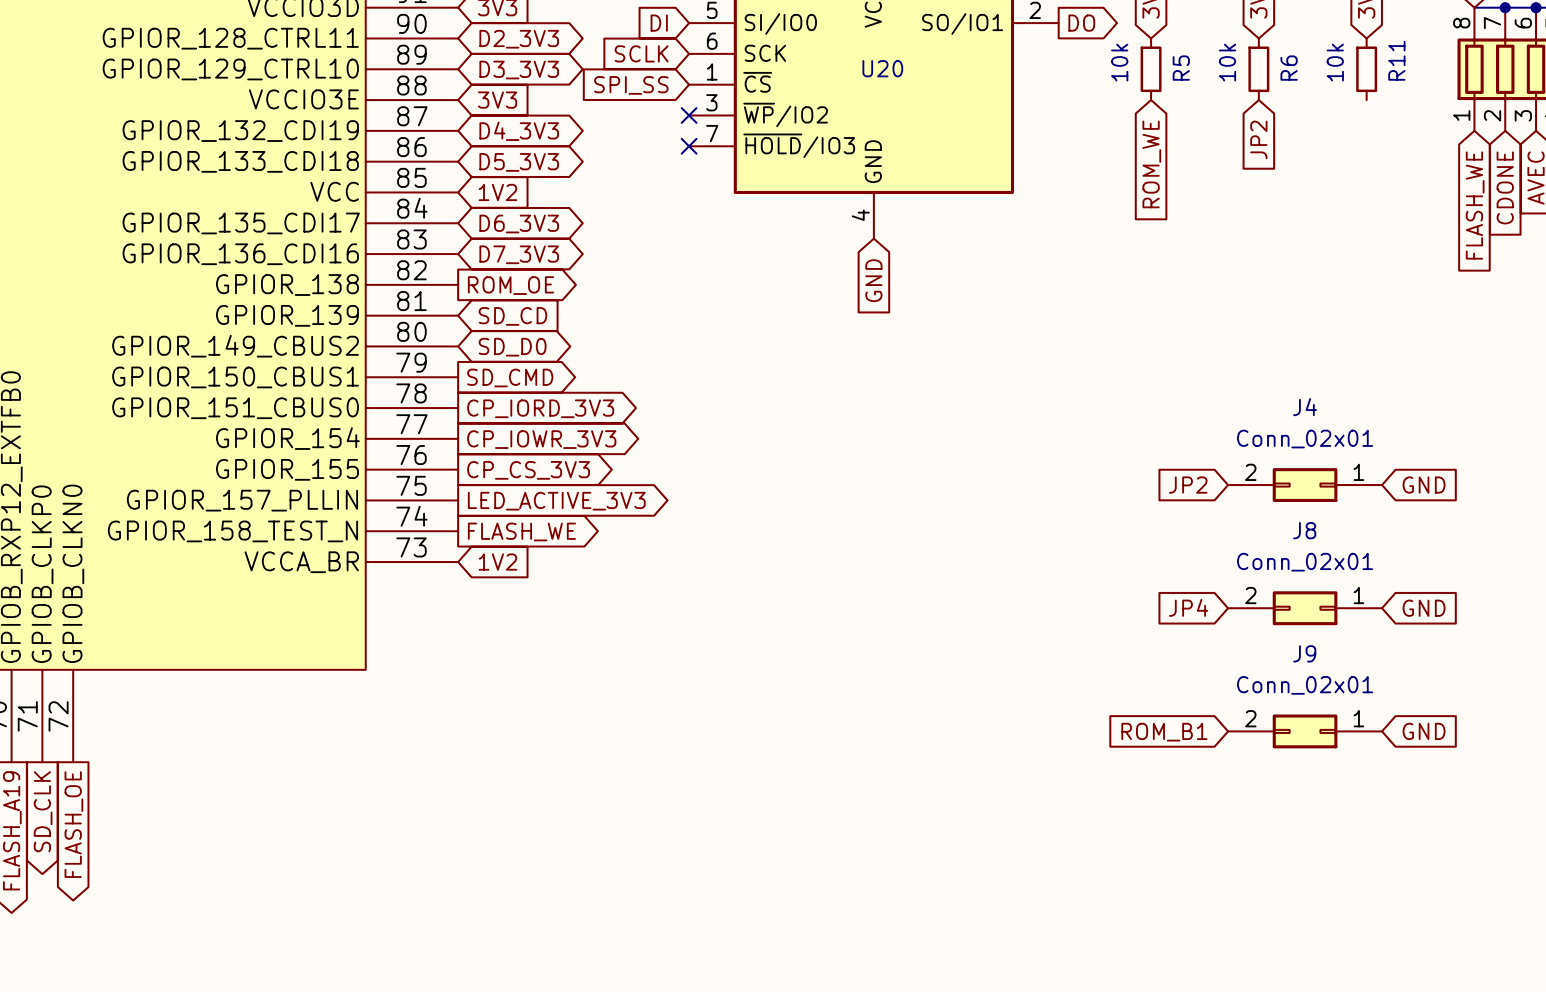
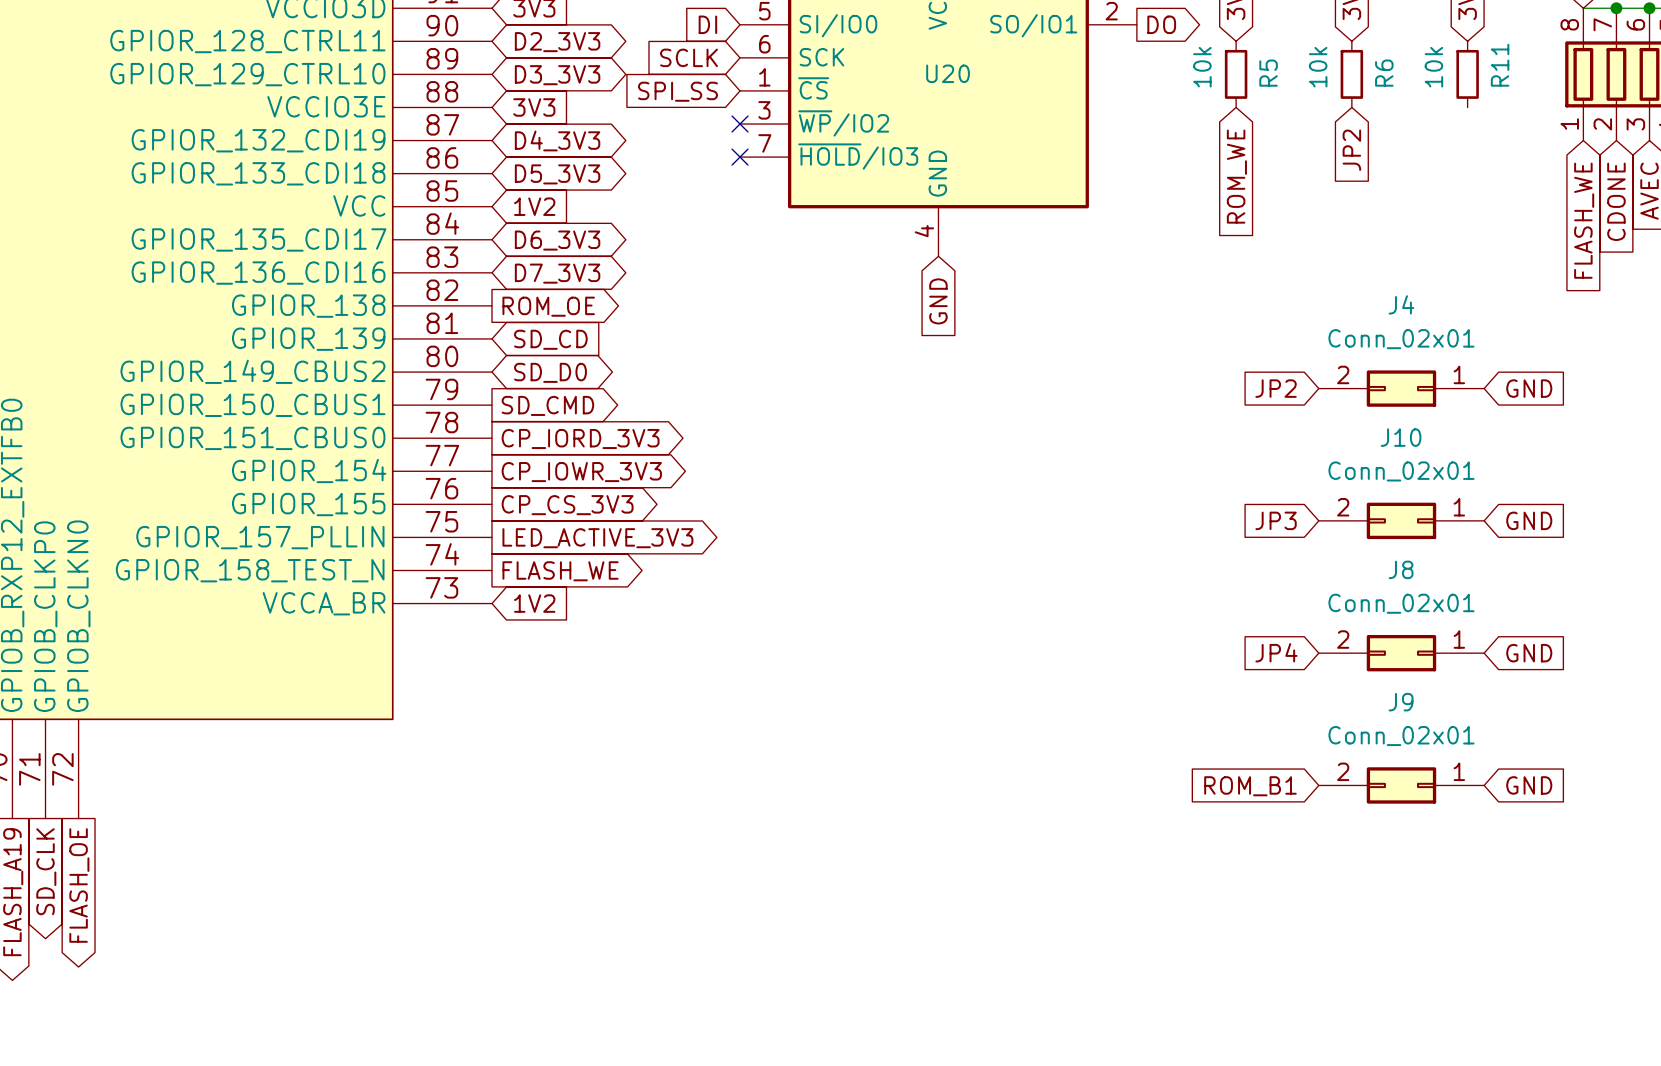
global label: none -> JP2 (1276, 388)
J4: none -> Conn_02x01 (1401, 388)
global label: none -> GND (1529, 388)
J4 name: J4 (1305, 407) -> J10 (1401, 437)
global label: JP2 (1188, 485) -> JP3 (1276, 520)

